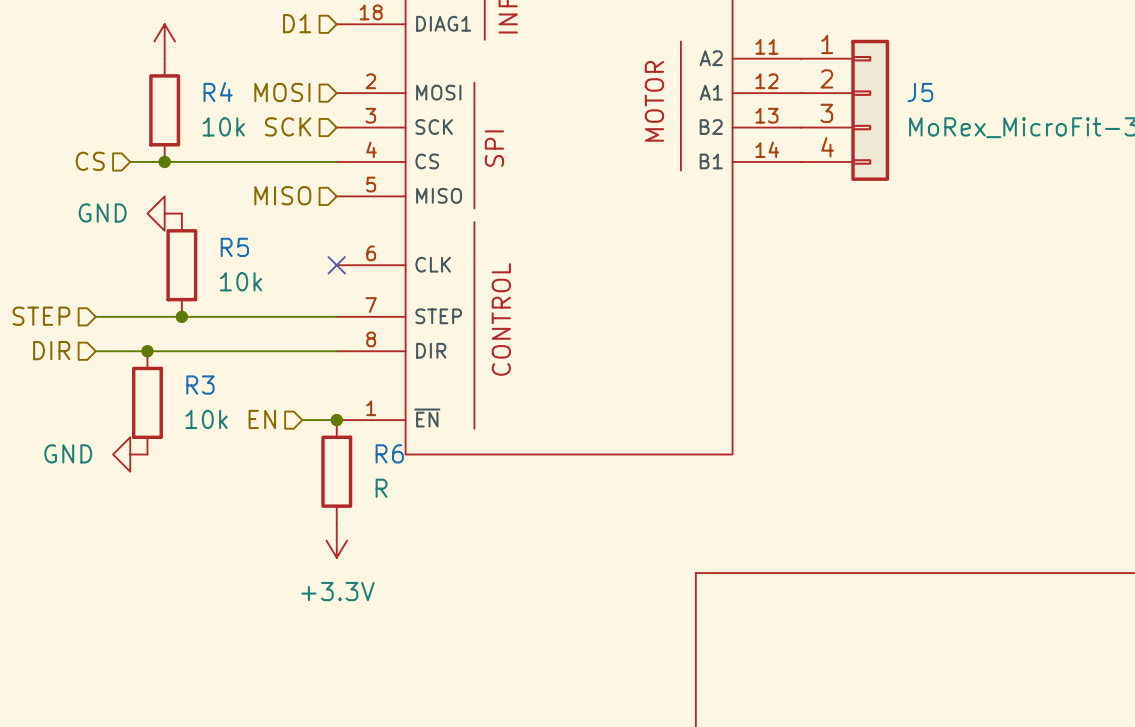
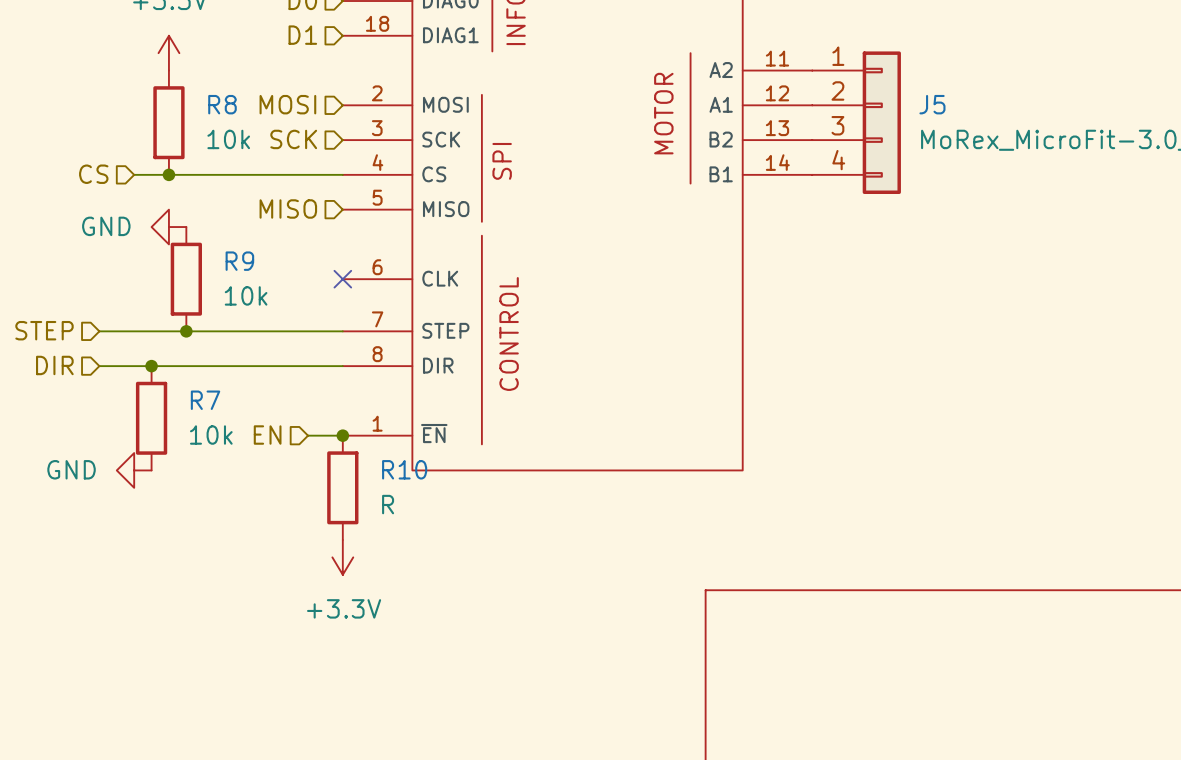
R4 name: R4 (218, 92) -> R8 (222, 104)
R5 name: R5 (234, 247) -> R9 (239, 261)
R3 name: R3 (200, 385) -> R7 (205, 400)
R6 name: R6 (389, 453) -> R10 (404, 469)

